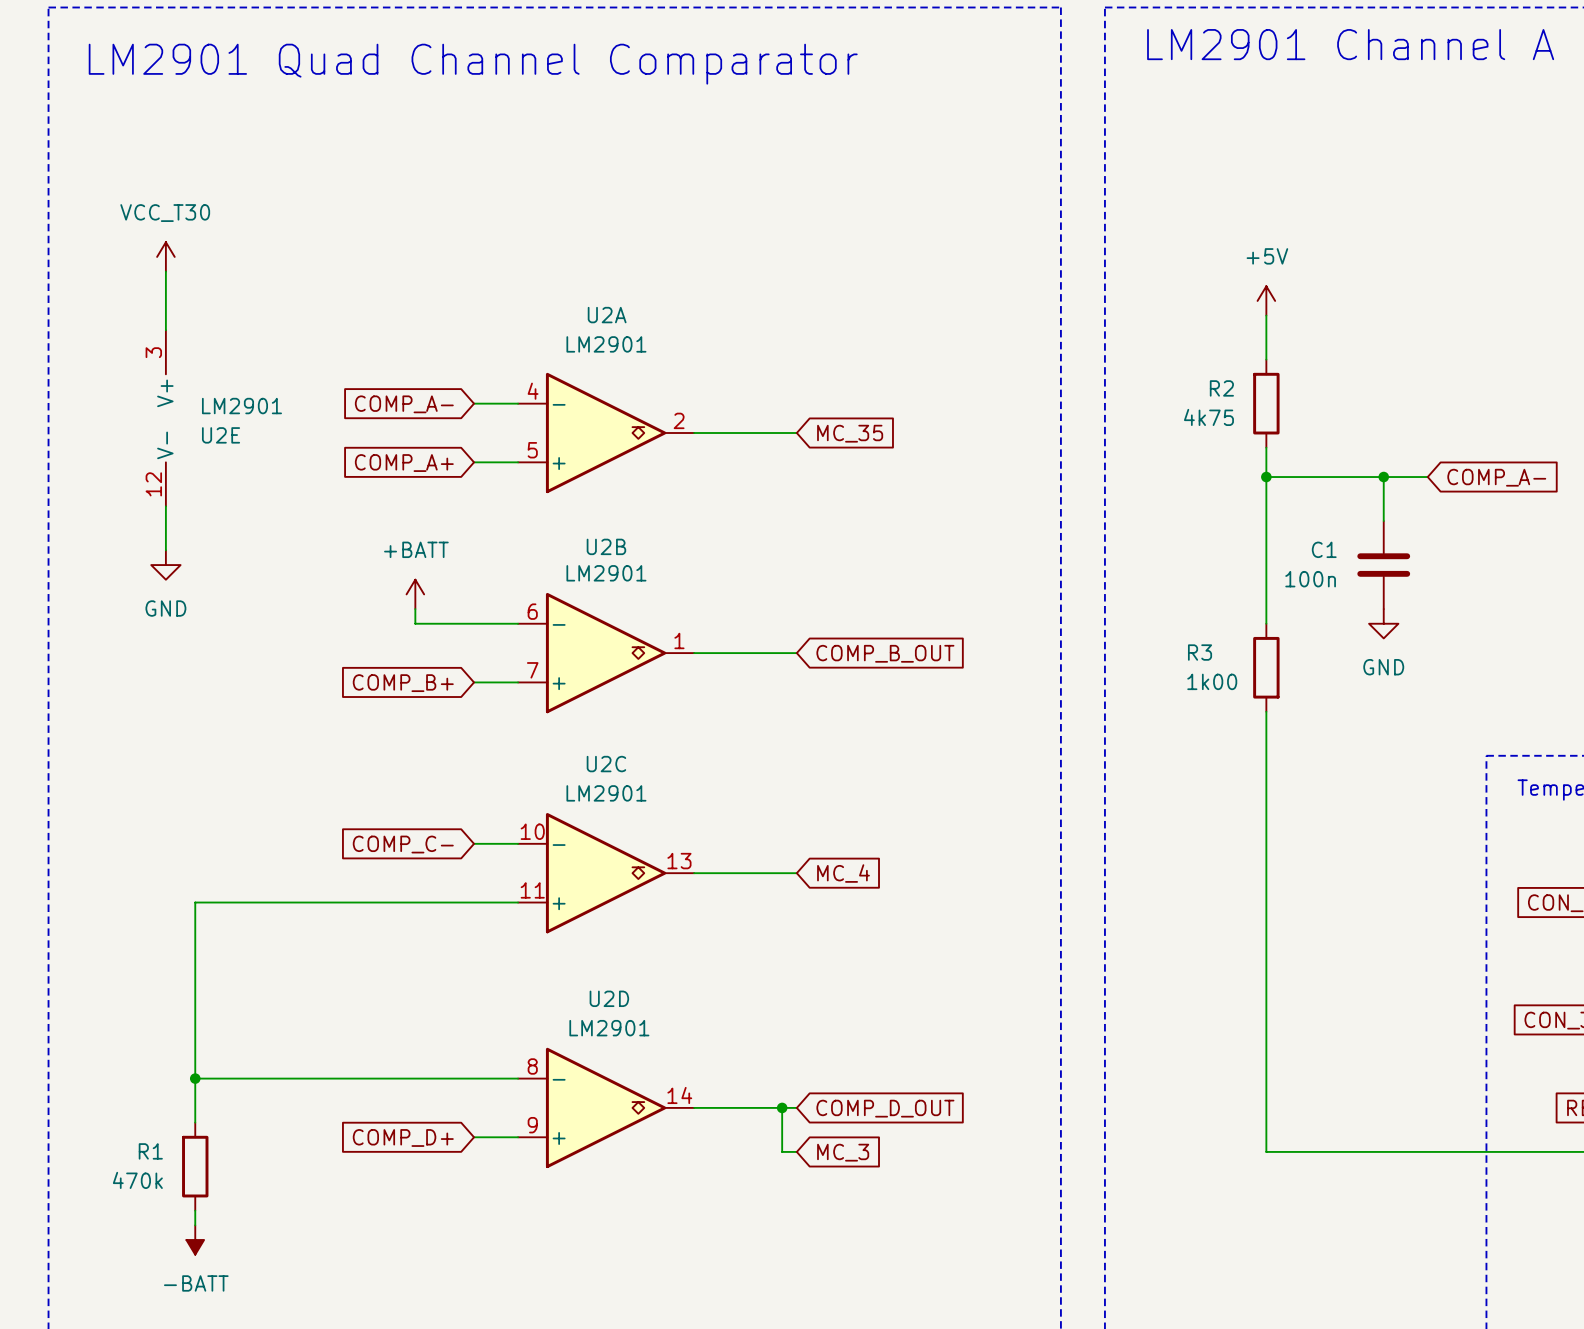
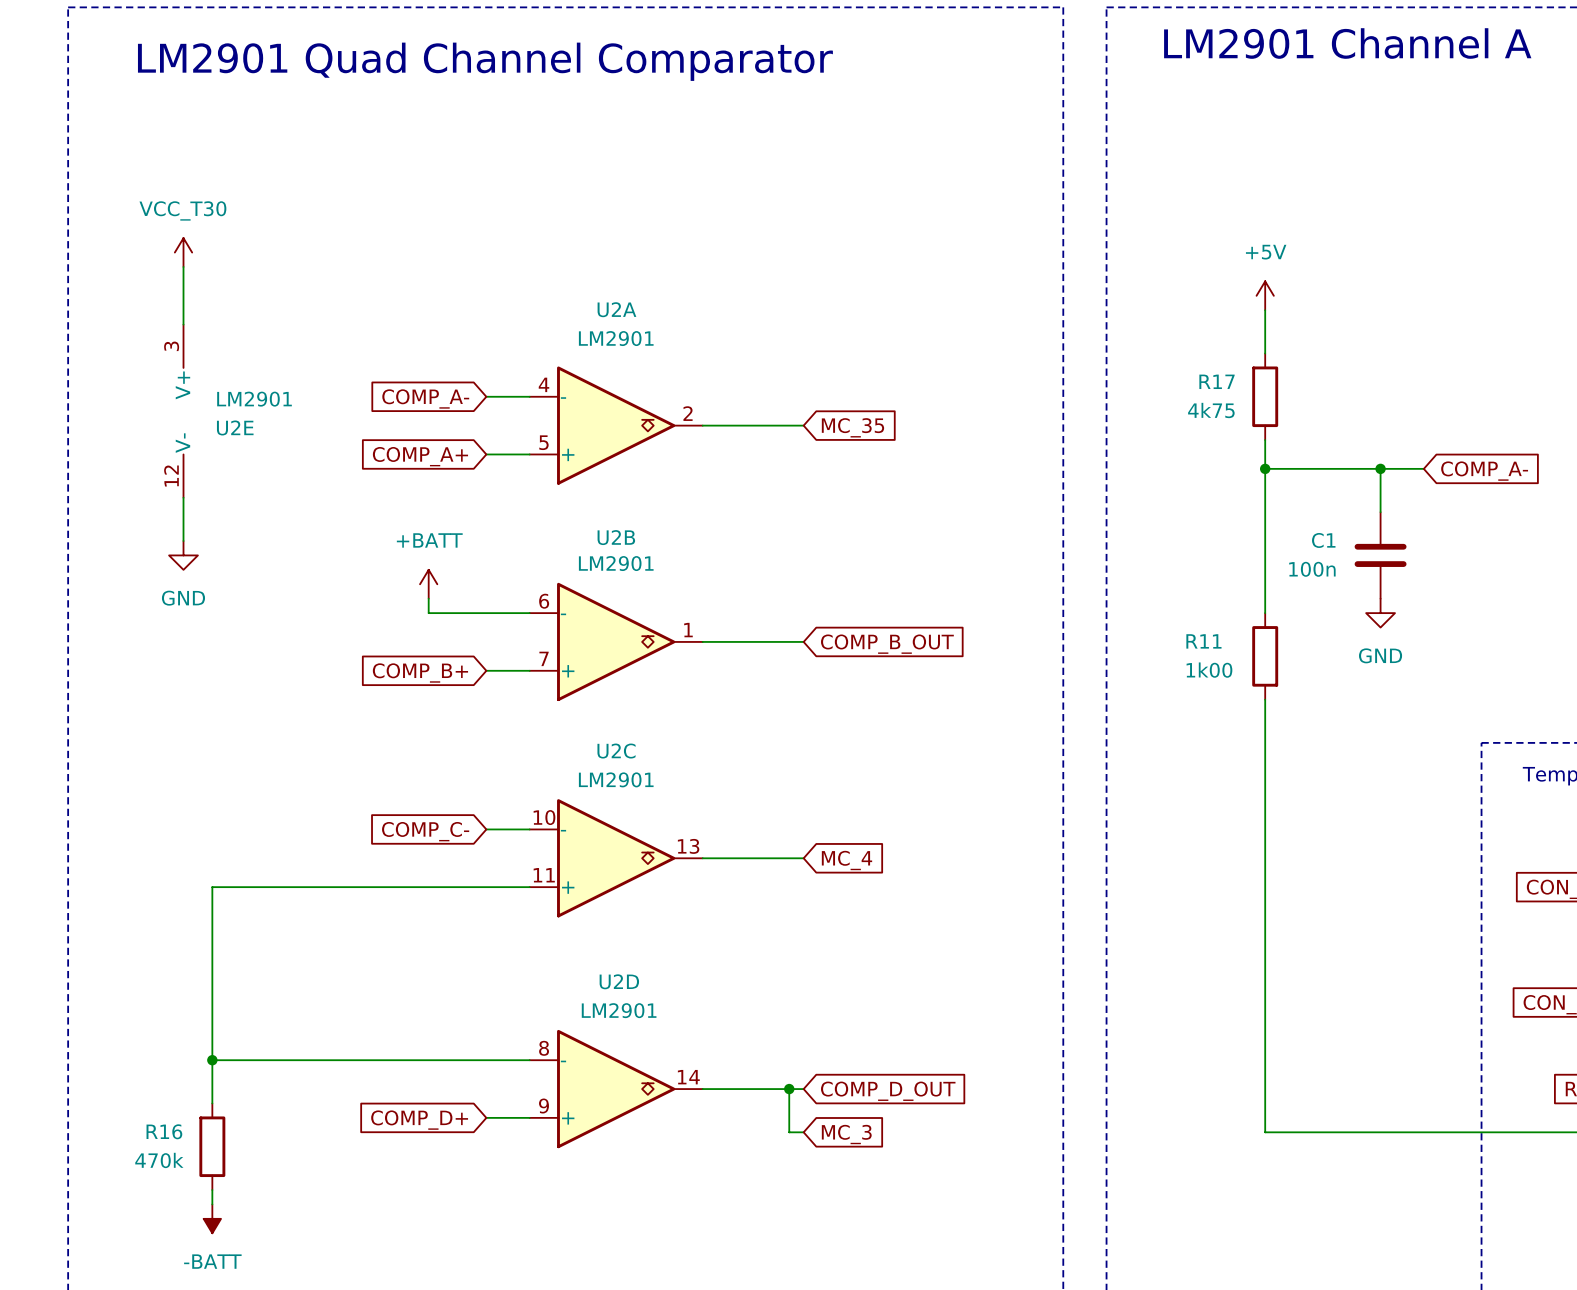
R2 name: R2 (1221, 388) -> R17 (1217, 381)
R3 name: R3 (1200, 652) -> R11 (1203, 641)
R1 name: R1 (150, 1151) -> R16 (164, 1131)

